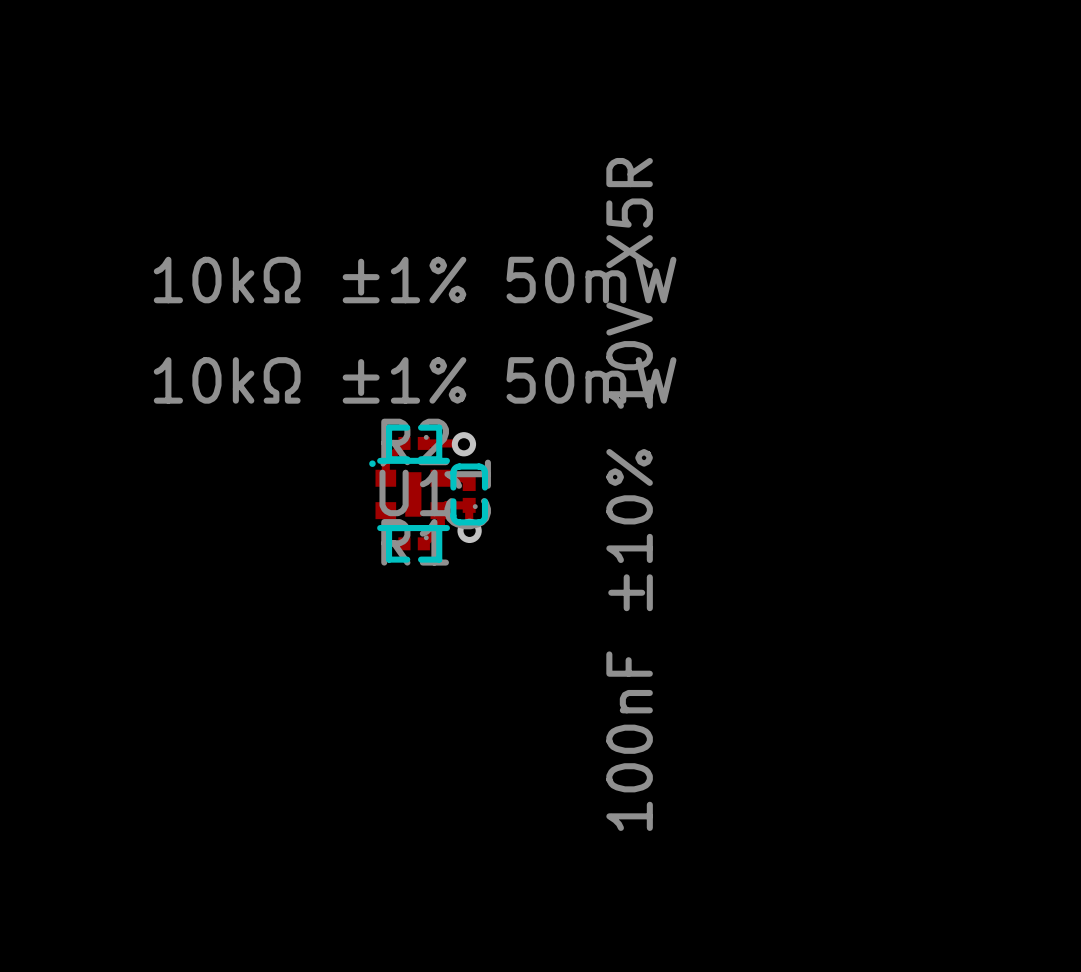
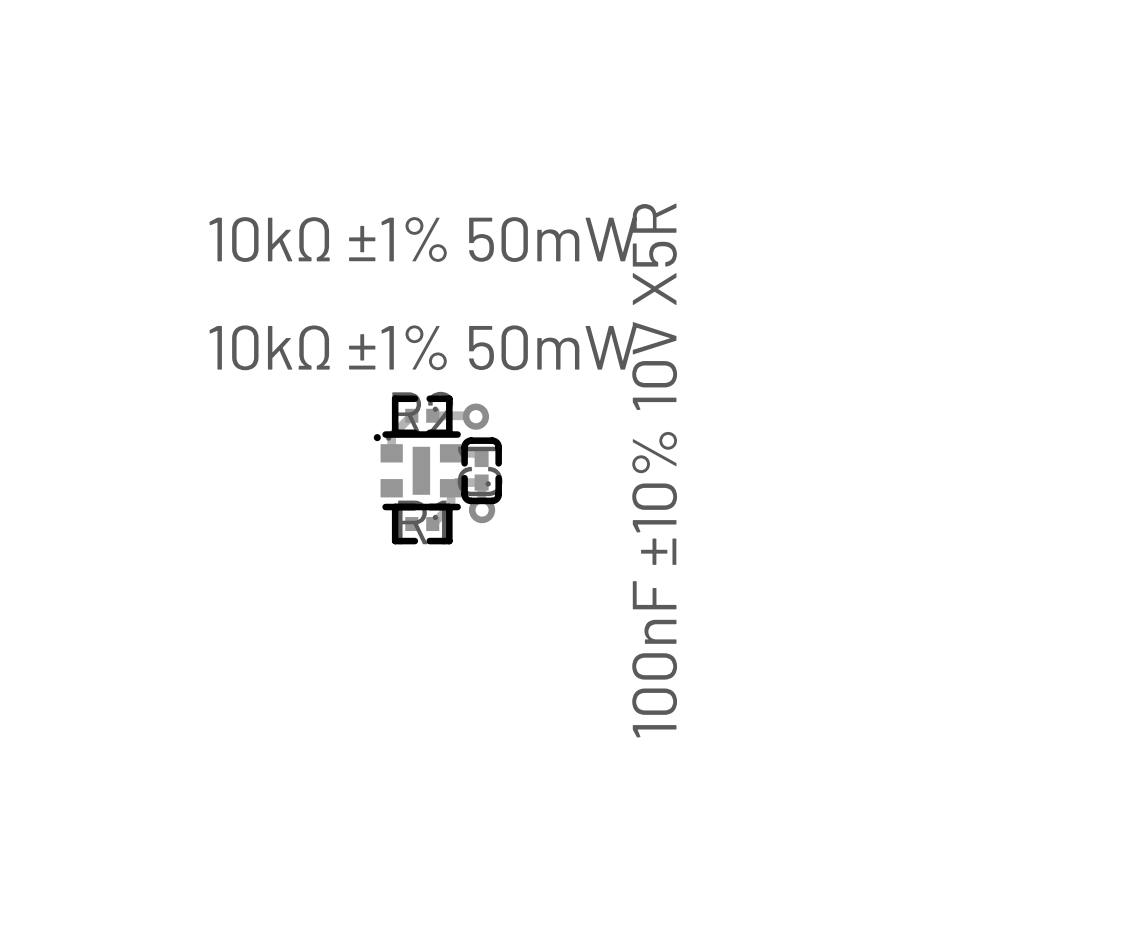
U1 name: U1 (414, 492) -> none

